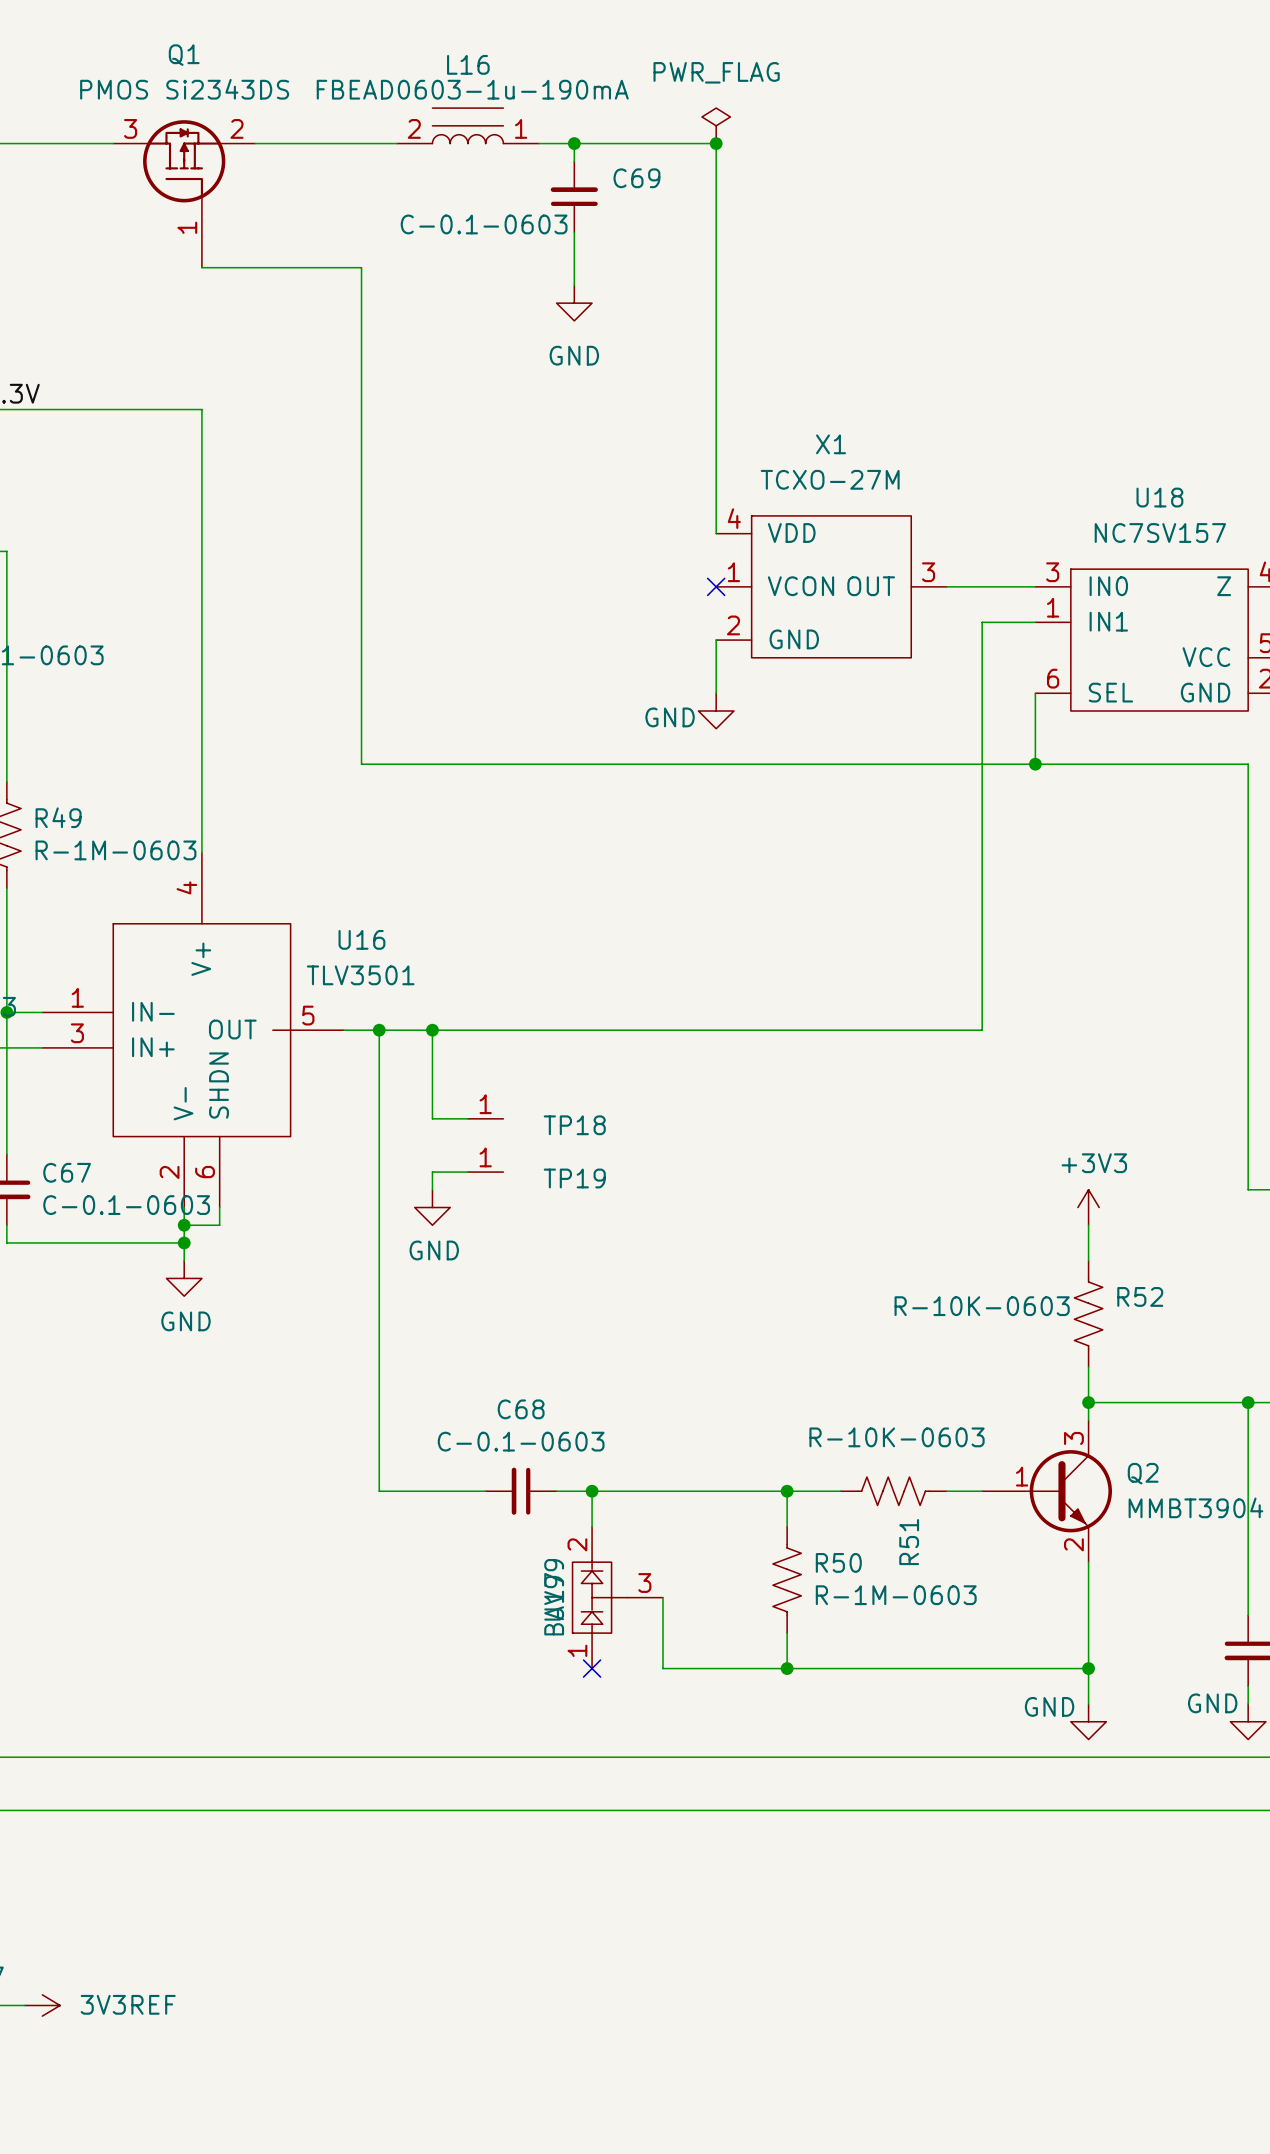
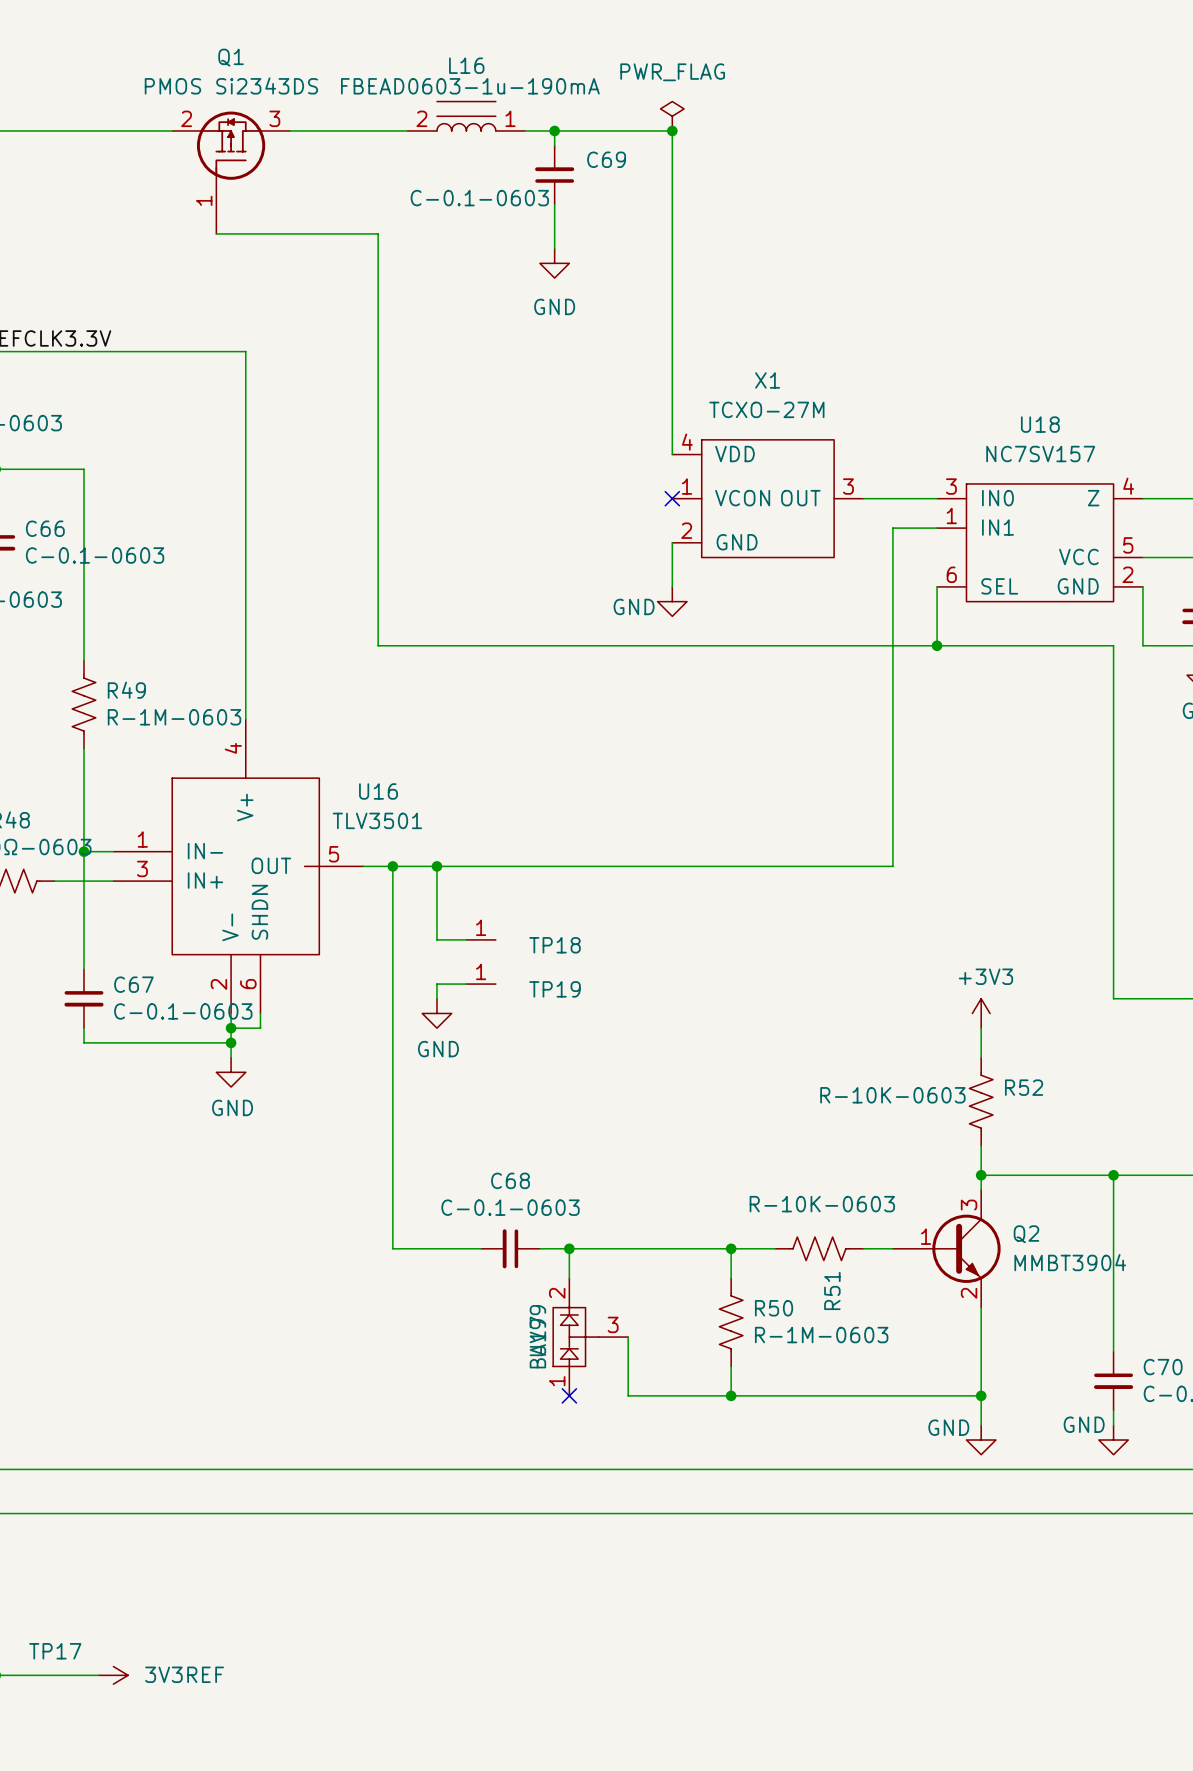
Q1 flip: as is (184, 161) -> left-right (231, 145)
wire: none -> (216, 233) (245, 233)

